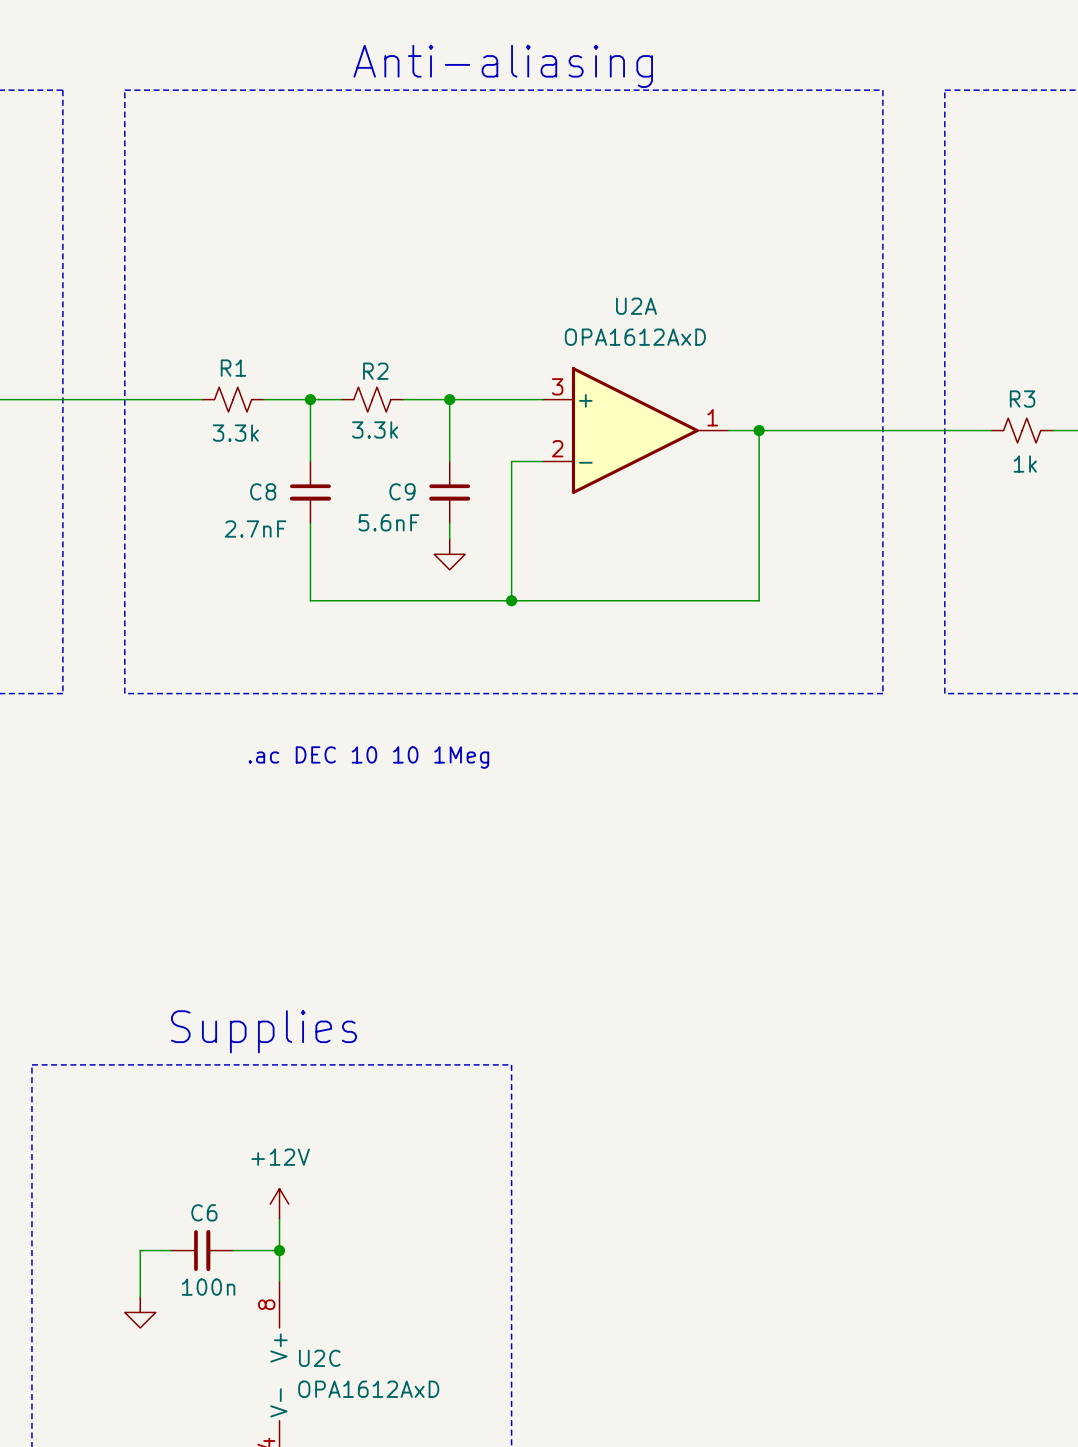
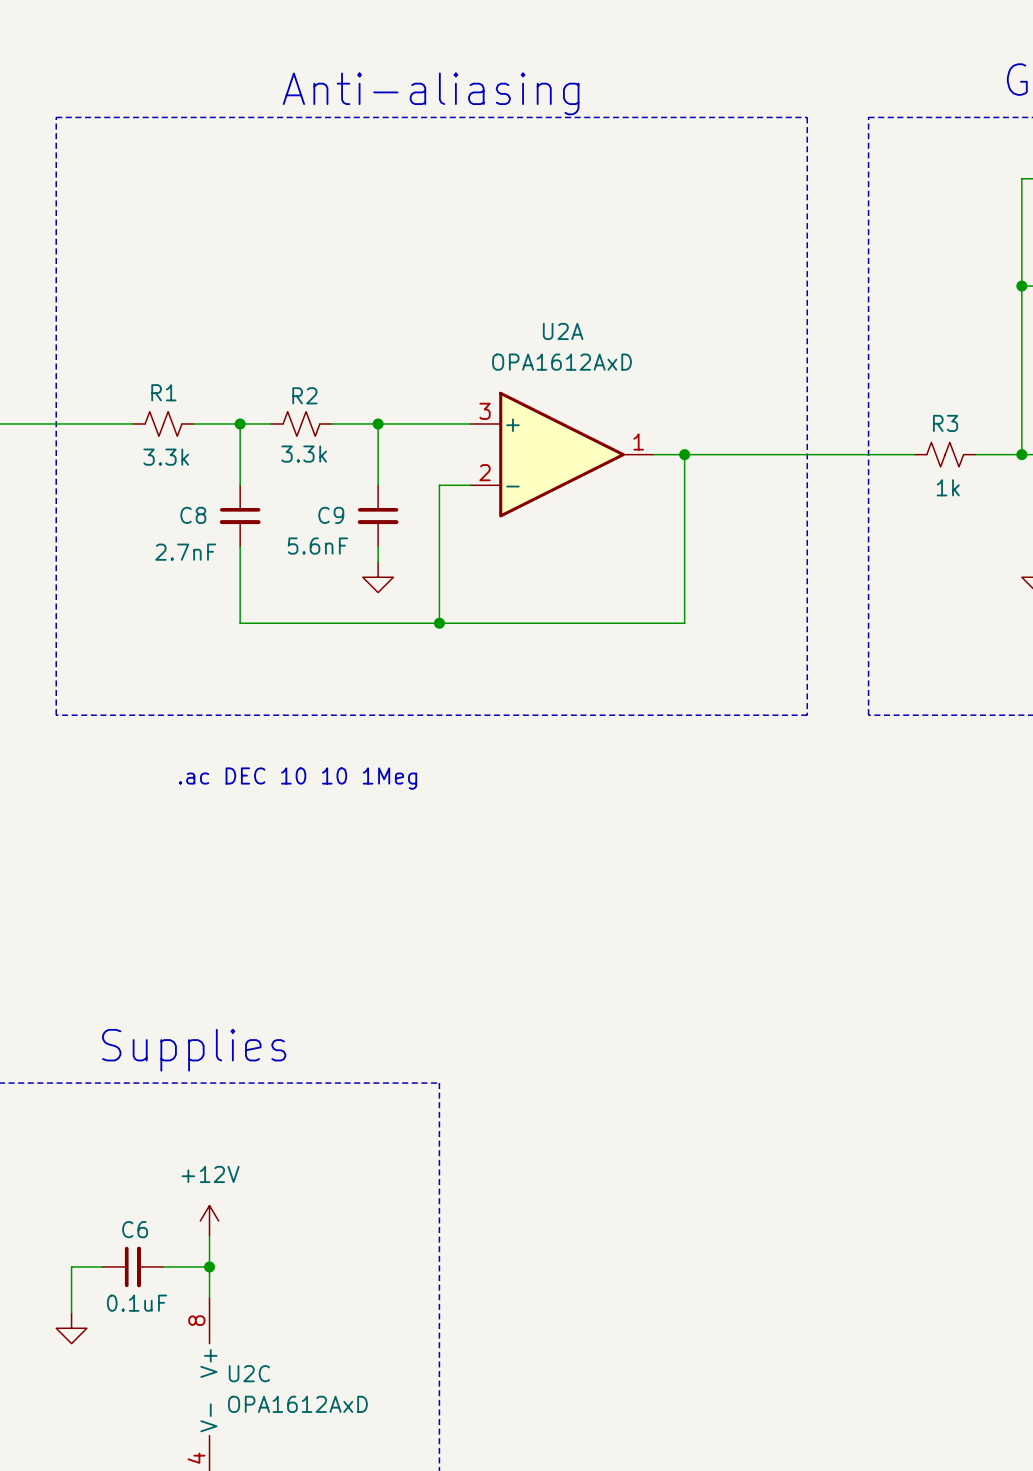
C6 value: 100n (208, 1287) -> 0.1uF (137, 1303)

